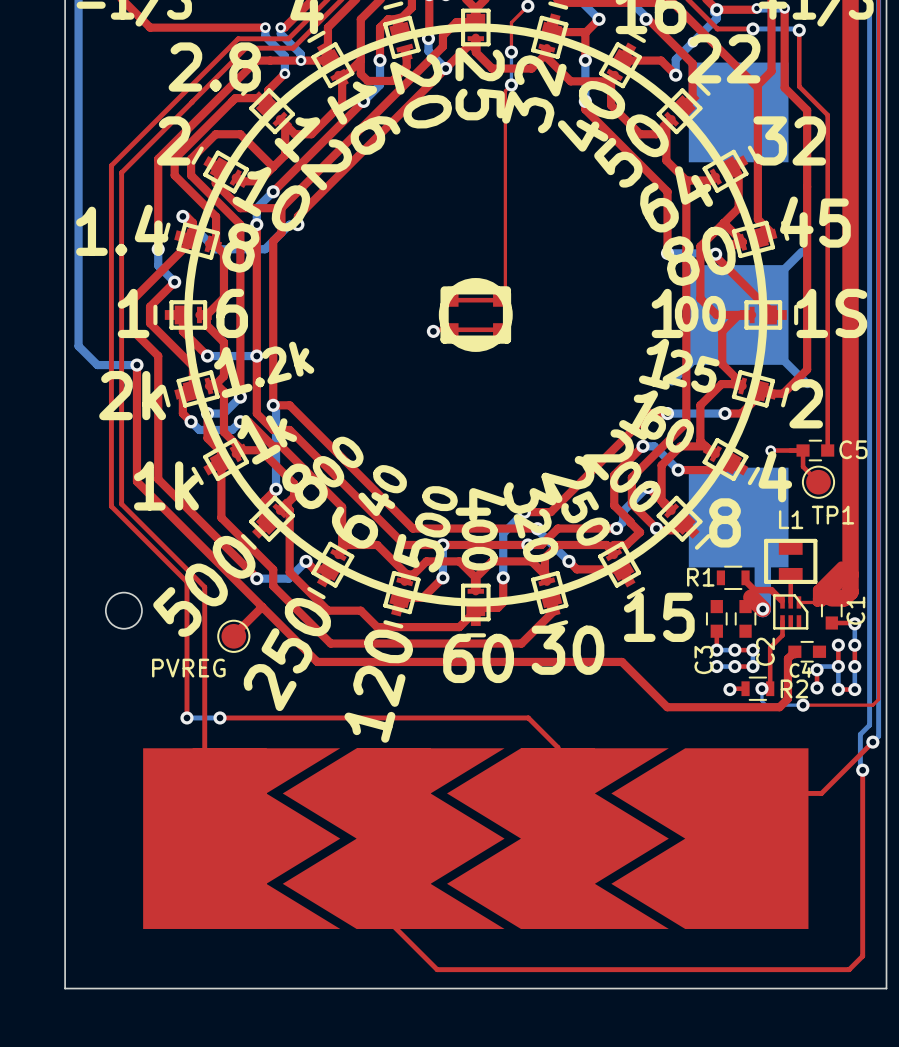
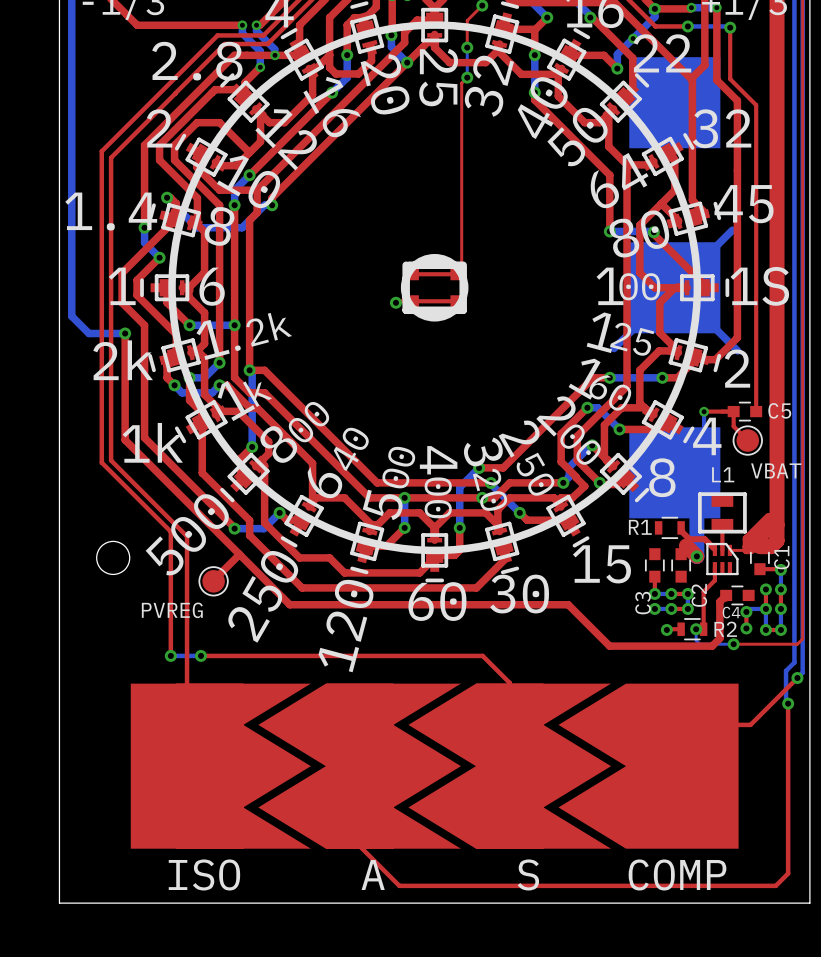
TP1 name: TP1 (832, 515) -> VBAT (776, 470)
text: none -> ISO (204, 874)
text: none -> A (373, 874)
text: none -> S (528, 874)
text: none -> COMP (677, 874)

